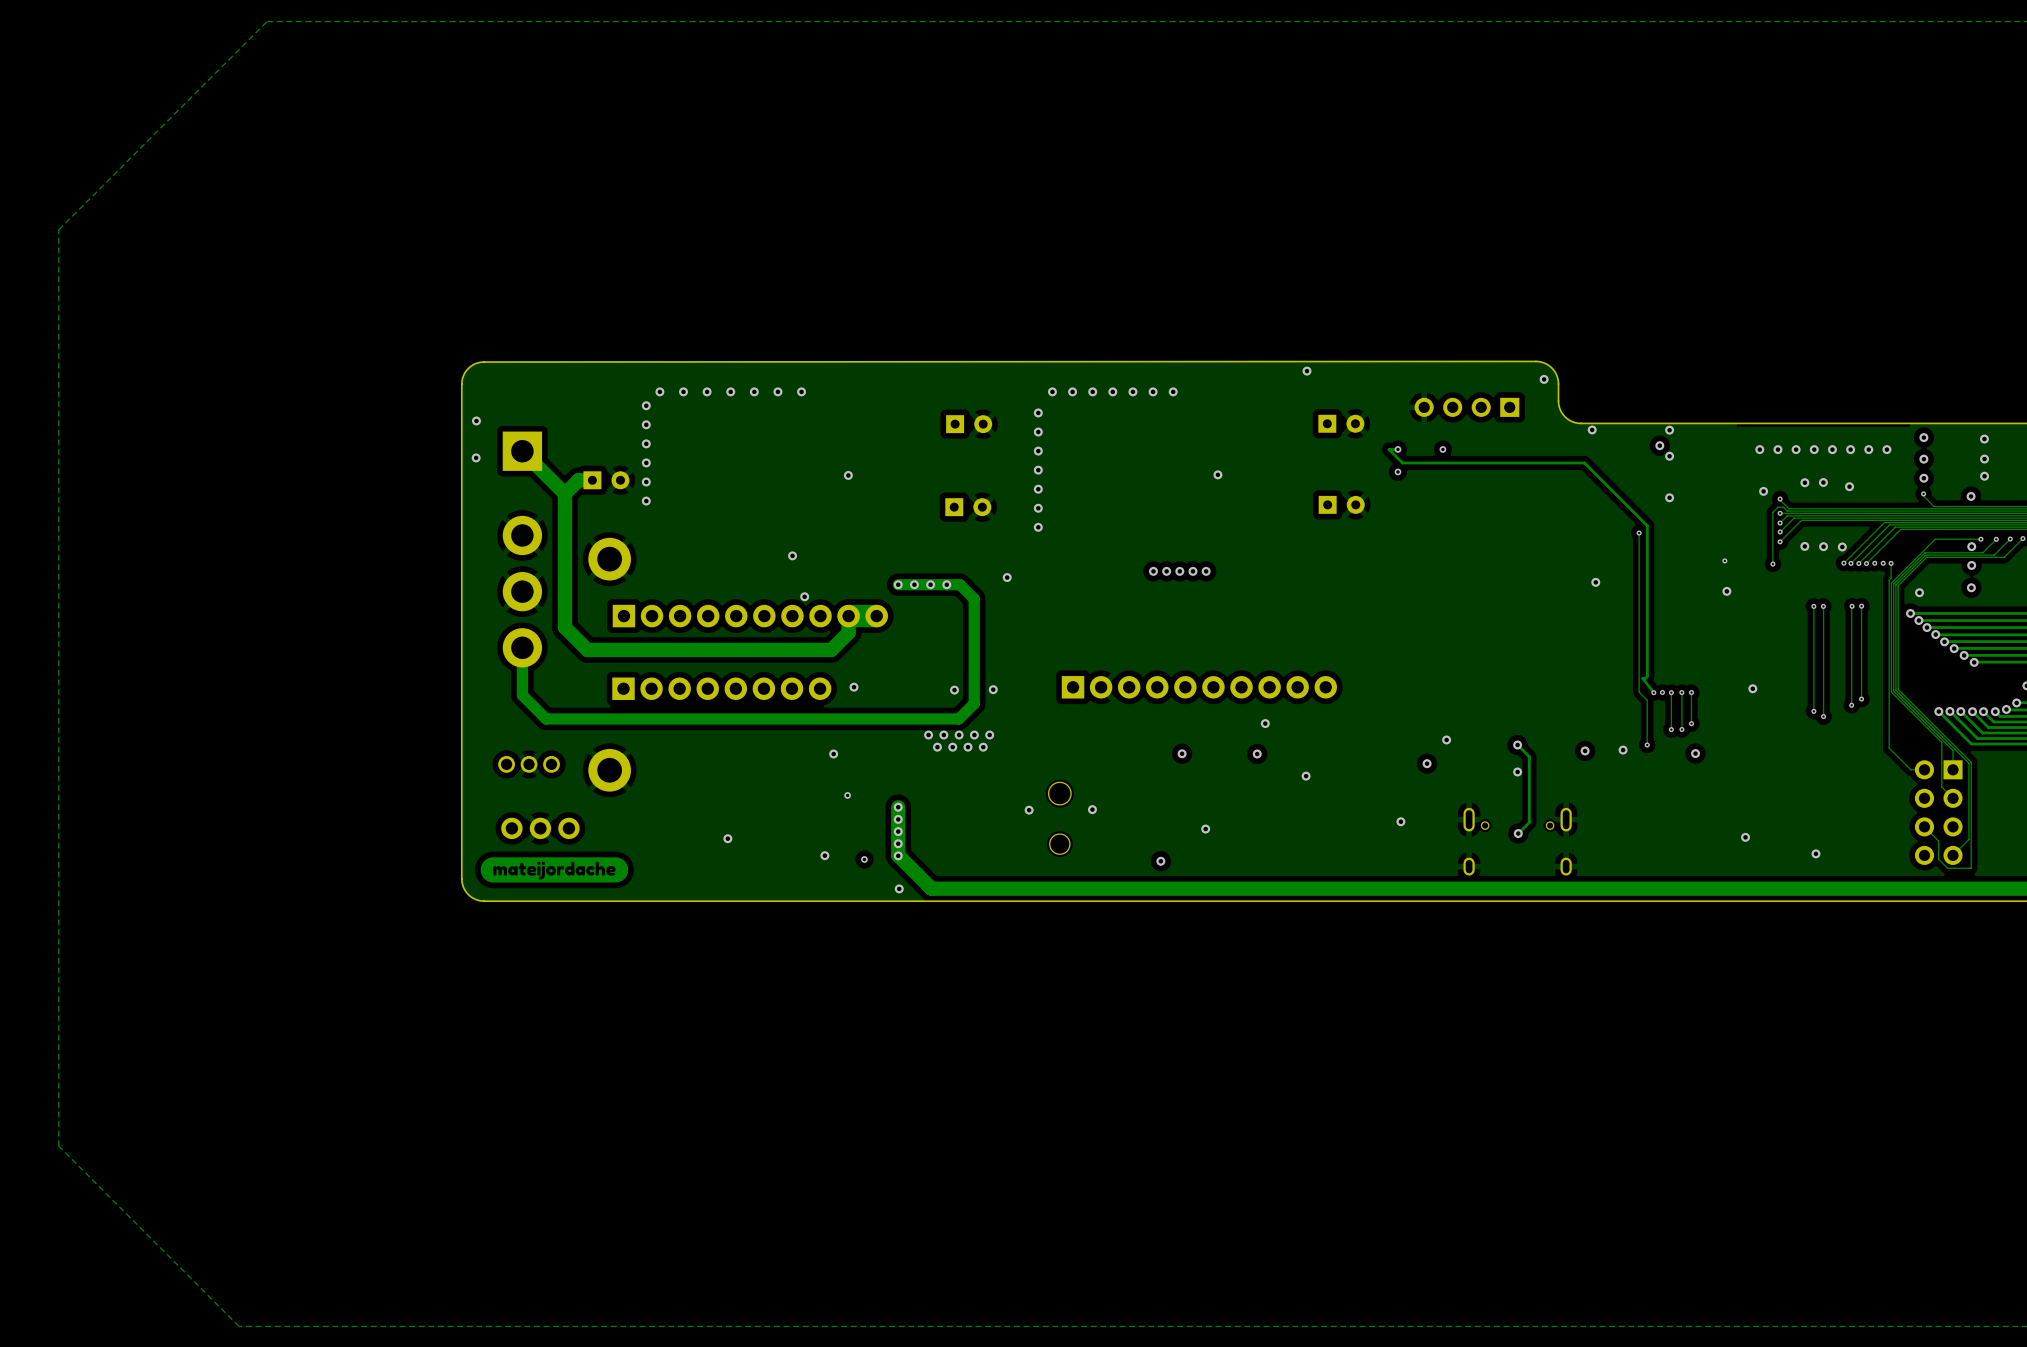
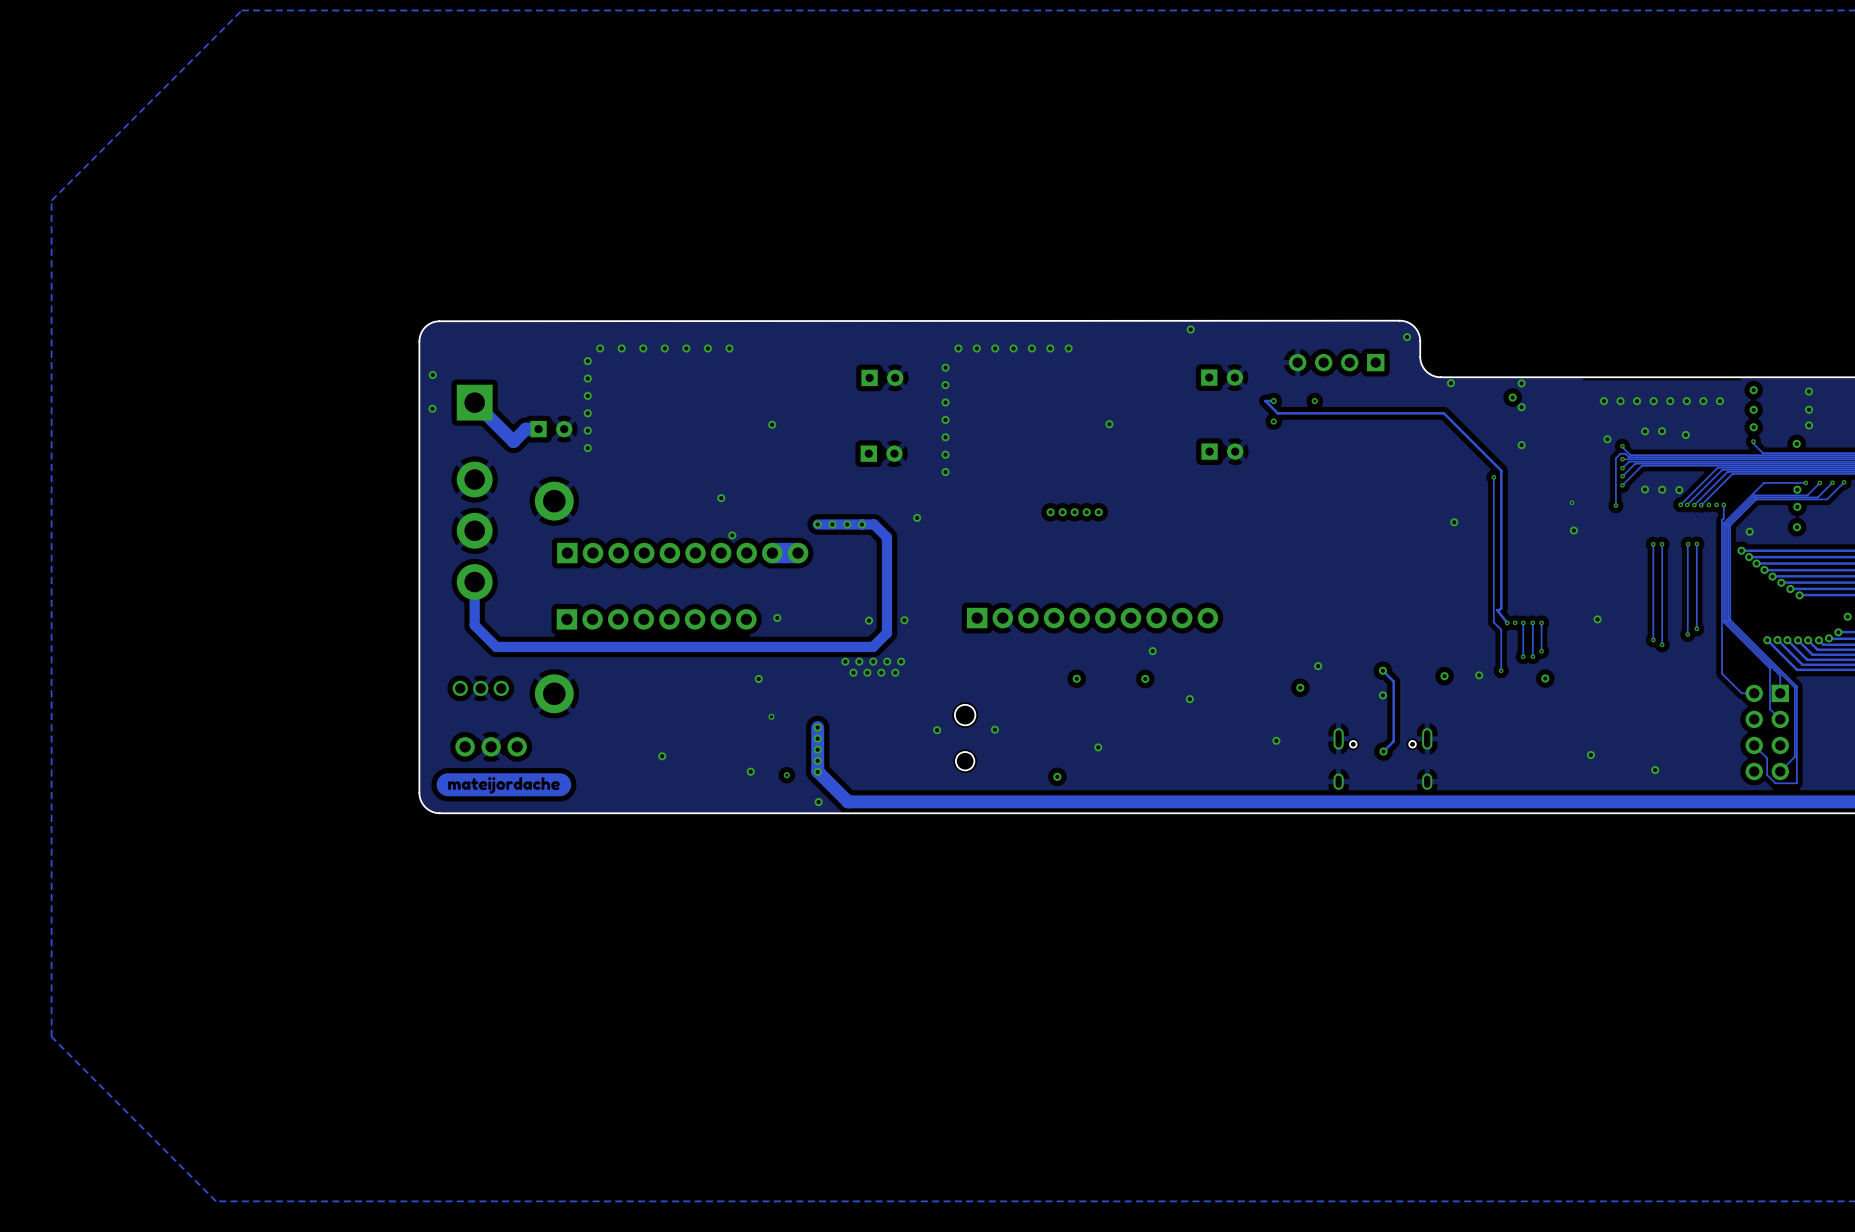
track: (564, 493) (564, 627) (587, 649) (831, 649) (848, 632) (848, 616) -> none

